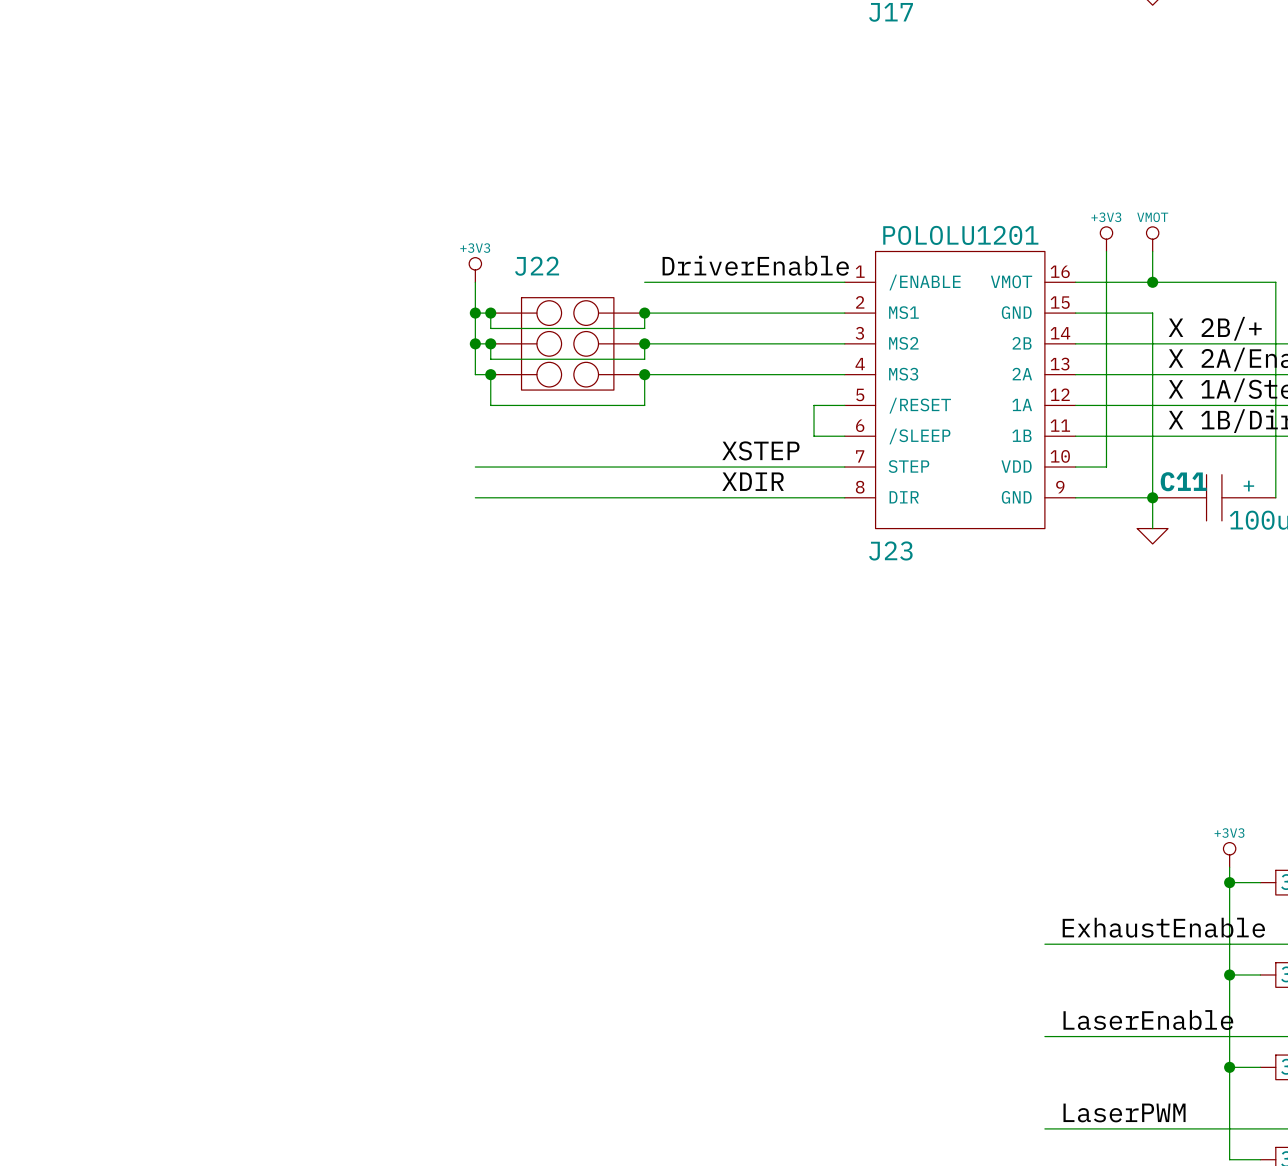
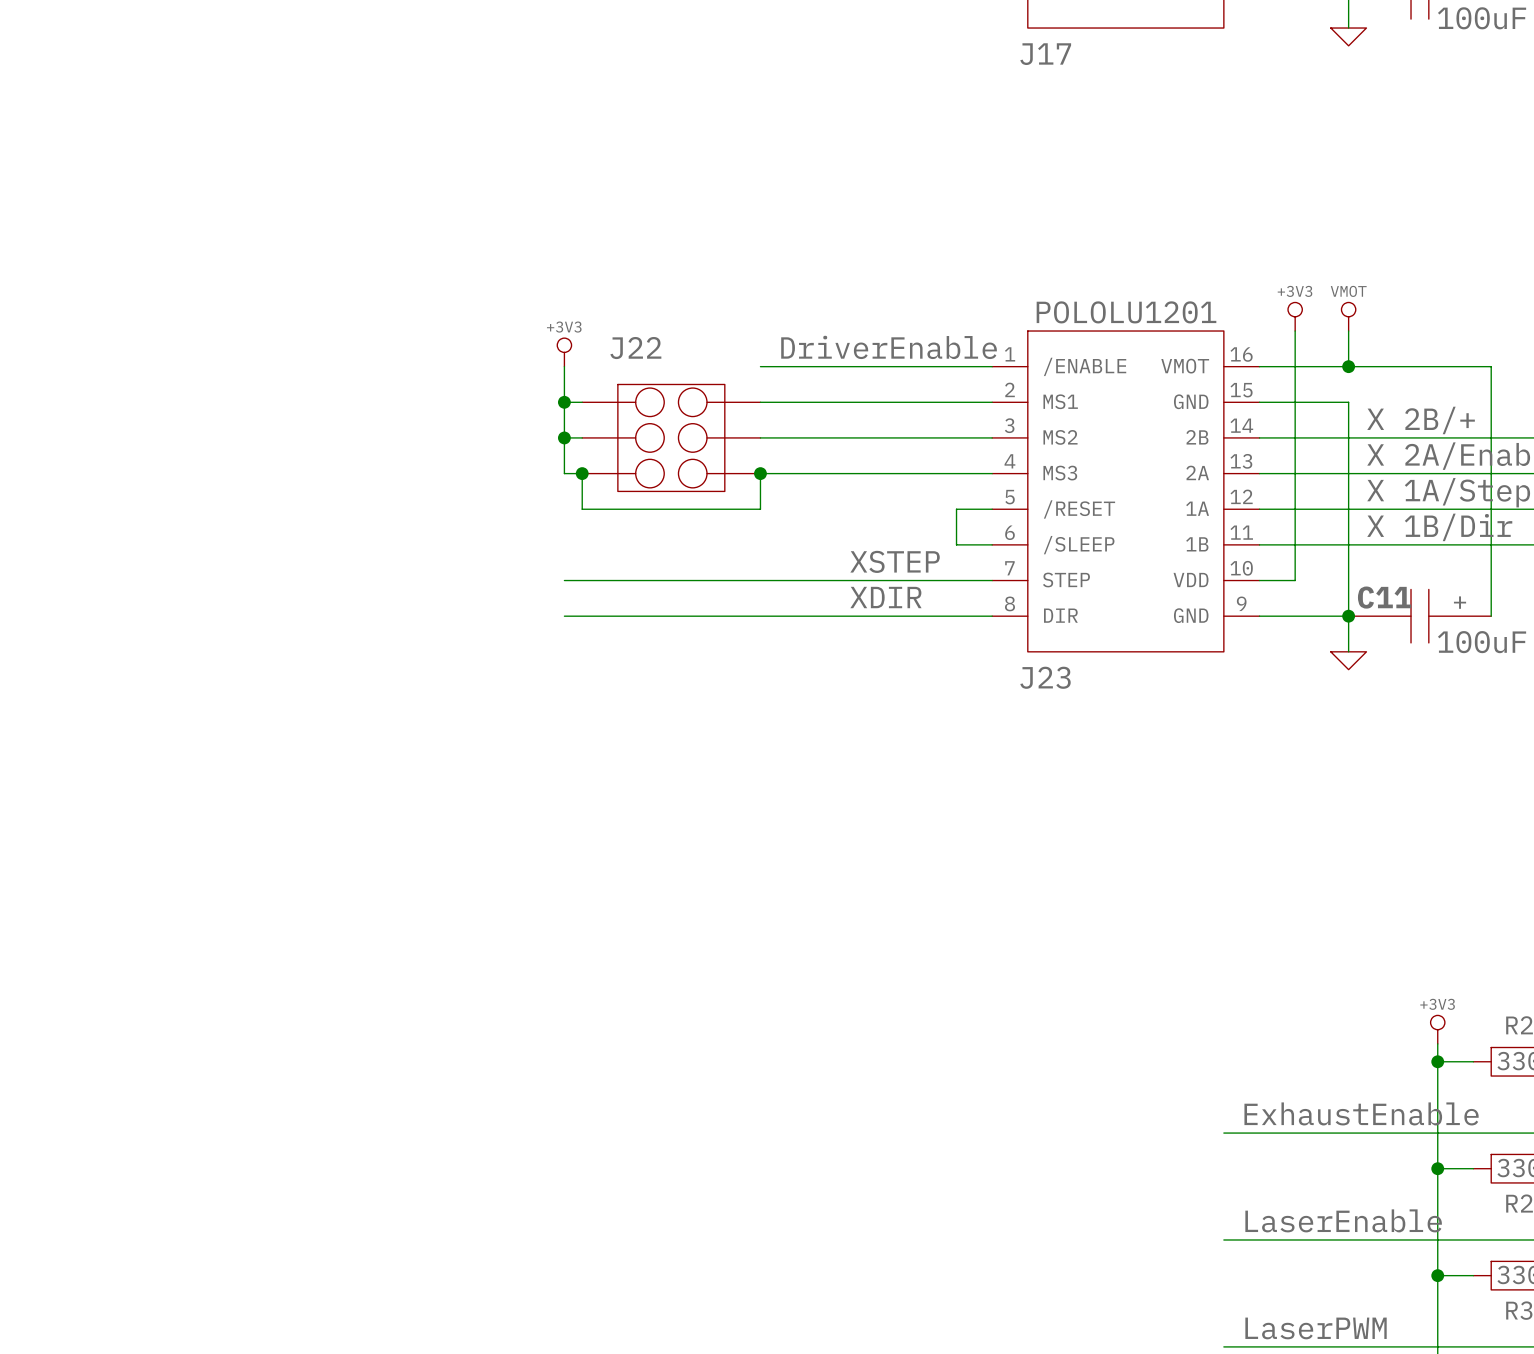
wire: (490, 313) (490, 328) (644, 328) (644, 313) -> none
junction: (490, 313) -> none
junction: (644, 313) -> none
wire: (490, 343) (490, 359) (644, 359) (644, 343) -> none
junction: (490, 343) -> none
junction: (644, 343) -> none

